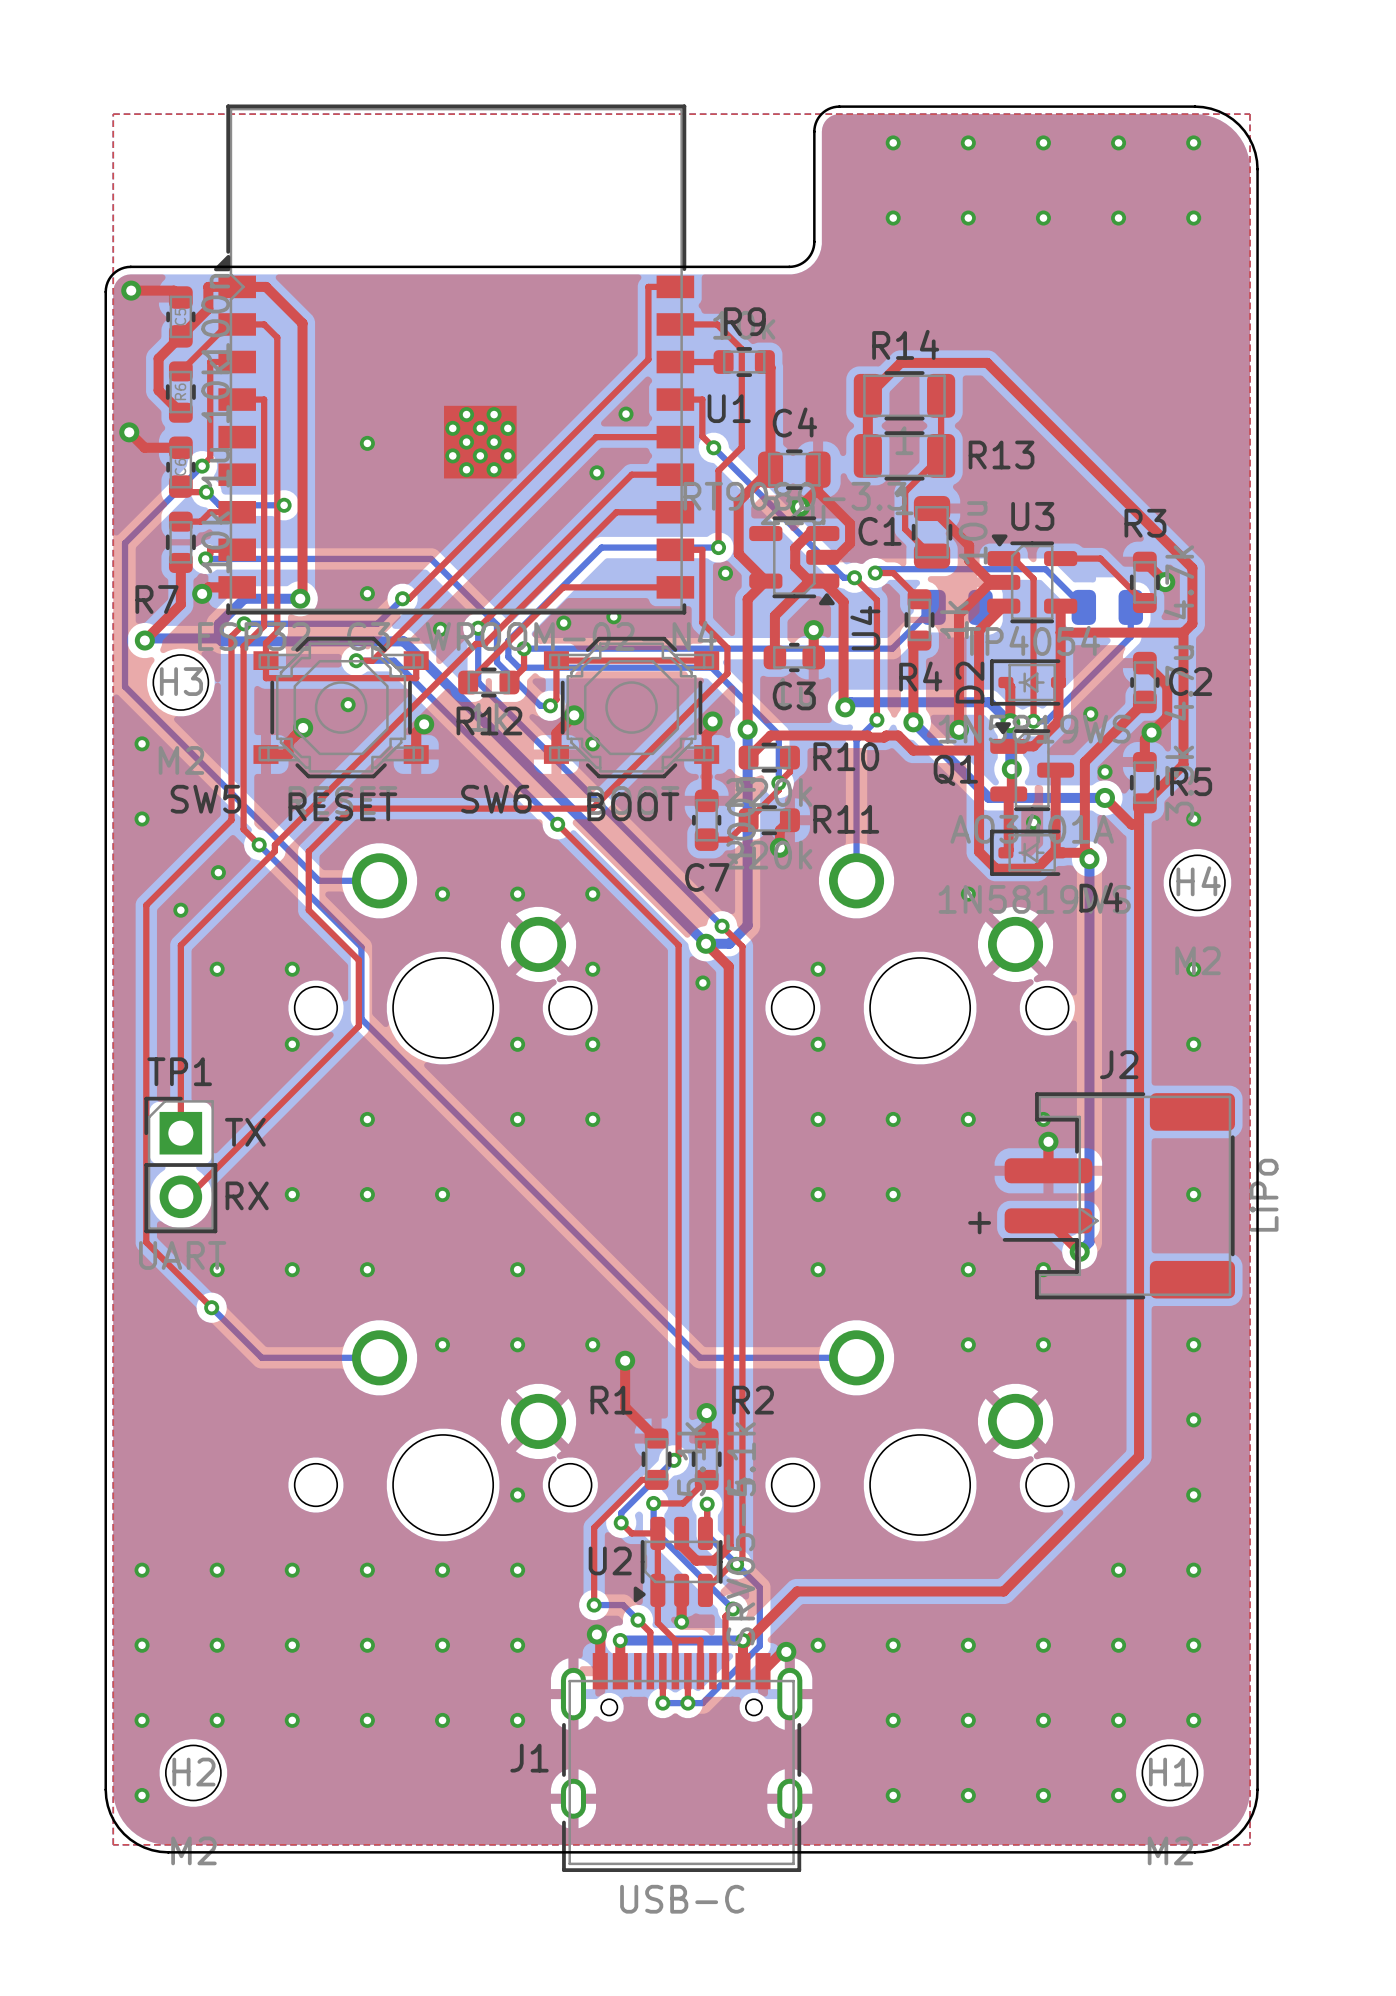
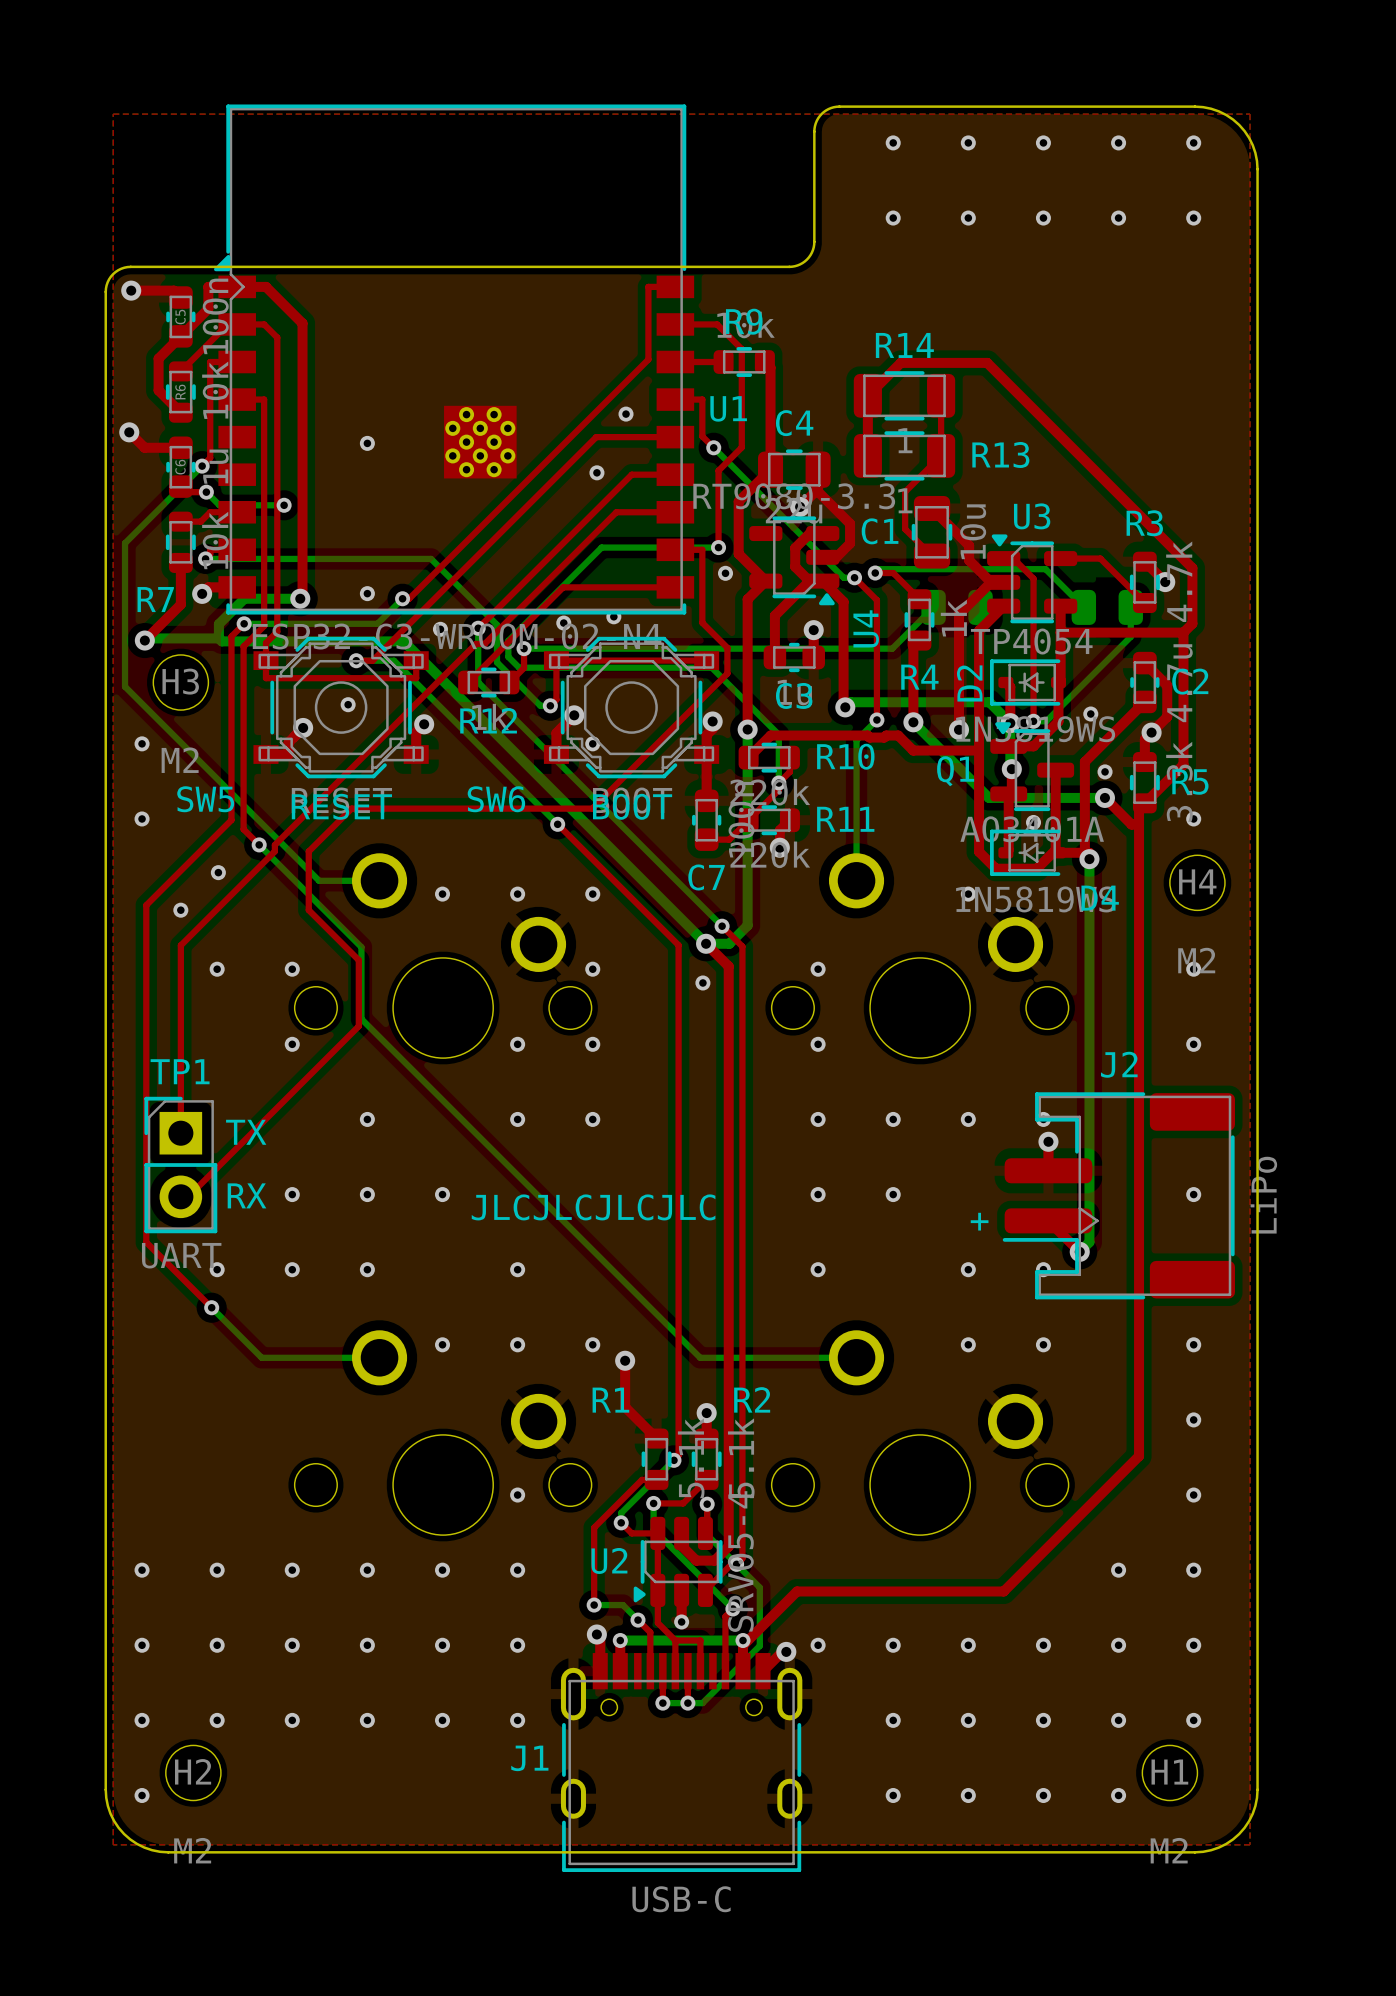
text: none -> JLCJLCJLCJLC (593, 1207)

